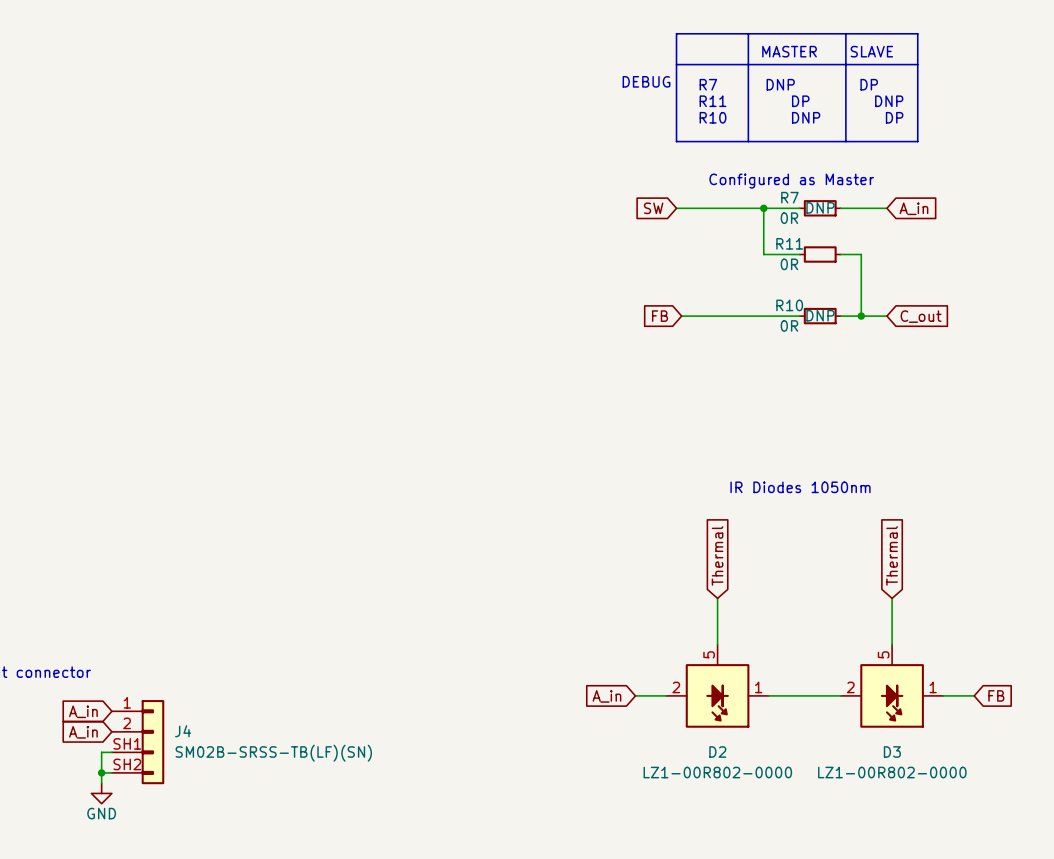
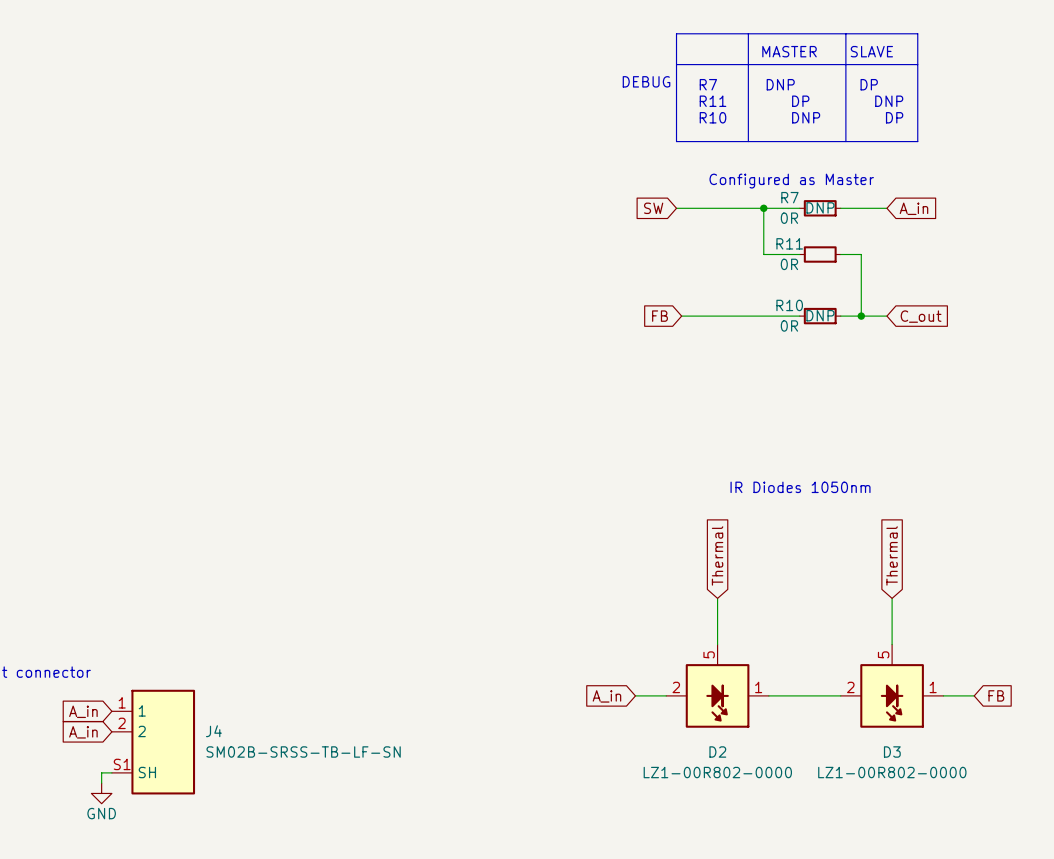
J4 symbol: [111, 700, 165, 785] -> [111, 689, 196, 795]
J4 value: none -> SM02B-SRSS-TB-LF-SN (303, 751)
wire: (111, 752) (101, 752) (101, 772) -> none
J4 text: SM02B-SRSS-TB(LF)(SN) (273, 753) -> none
junction: (101, 772) -> none

